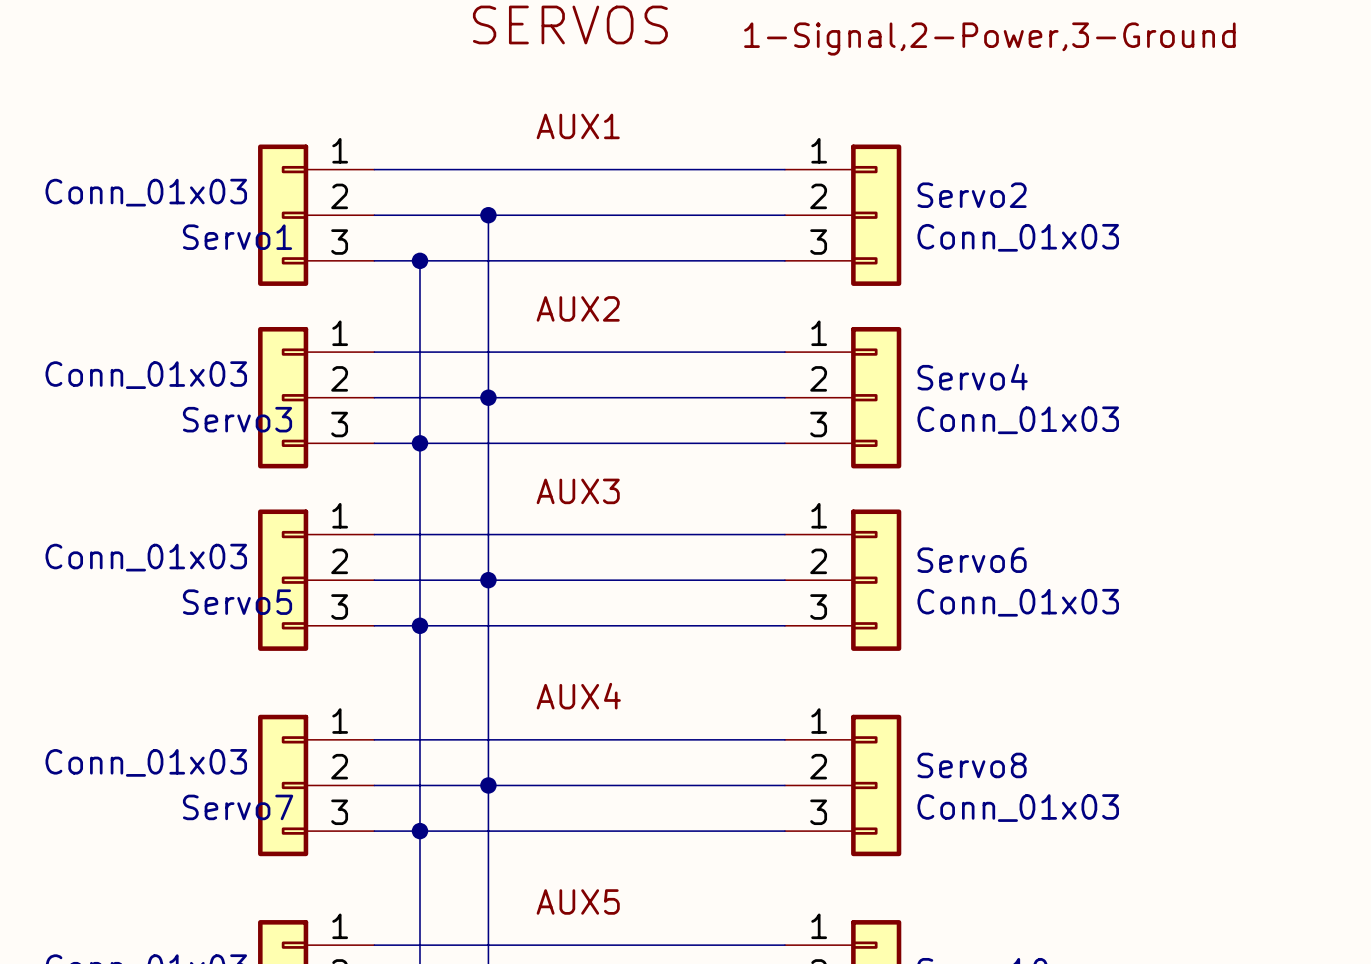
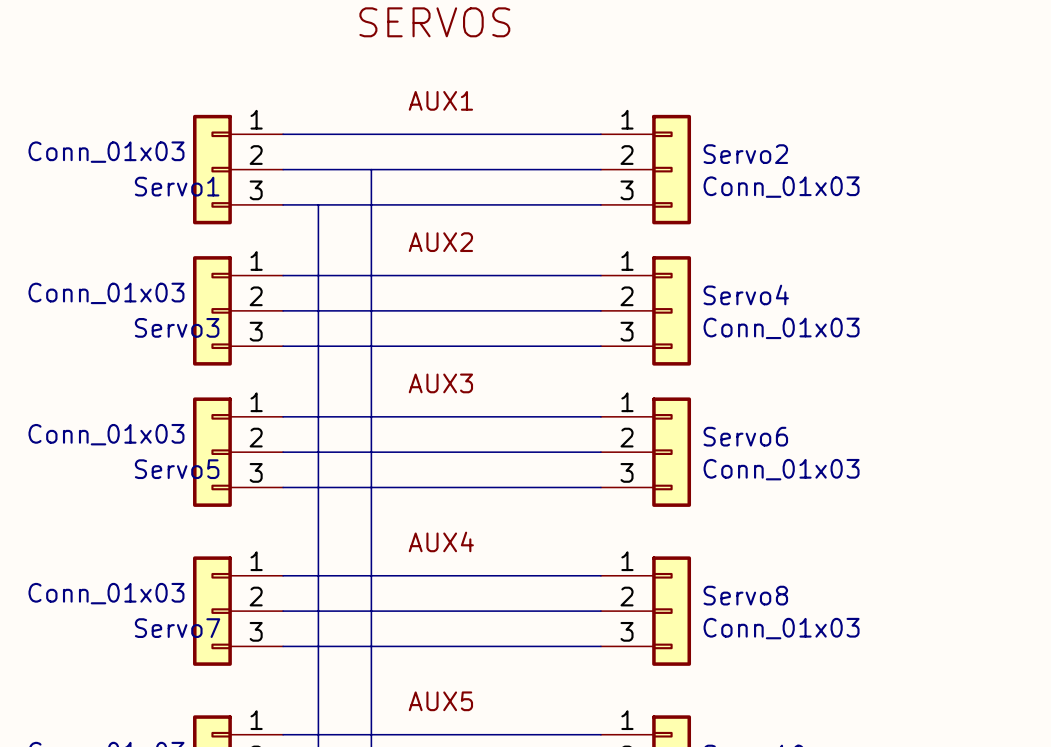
label: 1-Signal,2-Power,3-Ground (989, 39) -> none
junction: (488, 215) -> none
junction: (419, 260) -> none
junction: (488, 397) -> none
junction: (419, 443) -> none
junction: (488, 580) -> none
junction: (419, 625) -> none
junction: (488, 785) -> none
junction: (419, 831) -> none

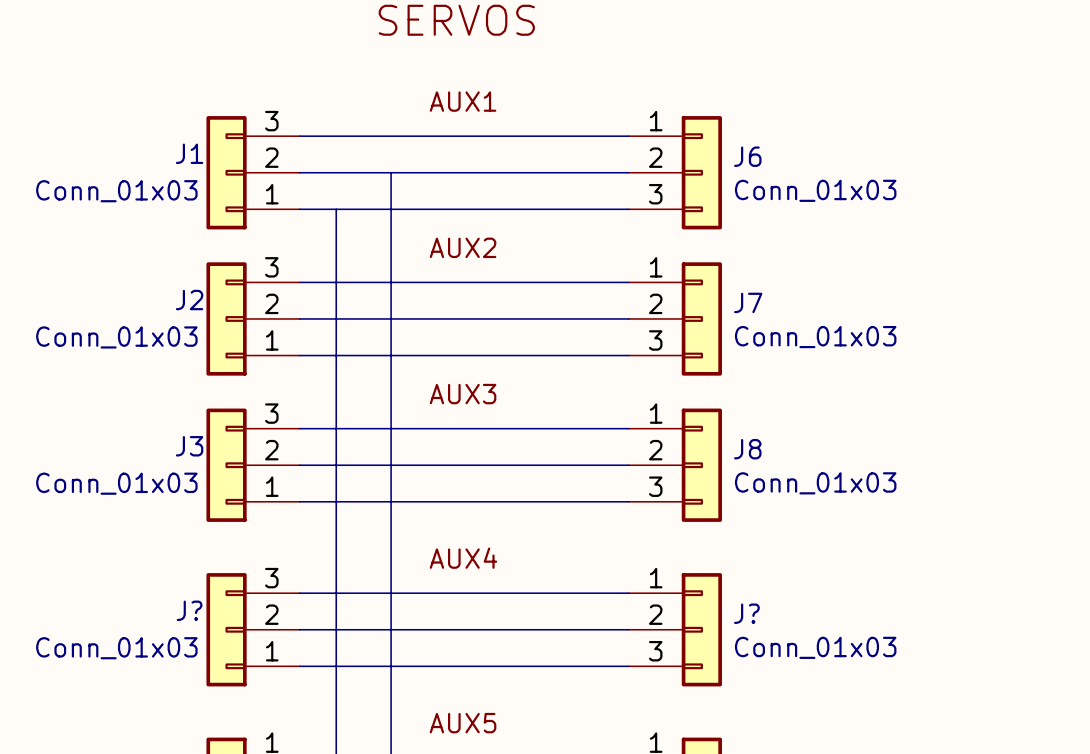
Servo2 name: Servo2 (745, 154) -> J6 (747, 156)
Servo1 flip: as is (212, 169) -> up-down (226, 172)
Servo1 name: Servo1 (177, 186) -> J1 (189, 153)
Servo4 name: Servo4 (746, 294) -> J7 (748, 302)
Servo3 flip: as is (212, 310) -> up-down (226, 318)
Servo3 name: Servo3 (177, 327) -> J2 (189, 300)
Servo6 name: Servo6 (745, 436) -> J8 (747, 449)
Servo5 flip: as is (212, 452) -> up-down (226, 465)
Servo5 name: Servo5 (177, 469) -> J3 (189, 446)
Servo8 name: Servo8 (745, 595) -> J? (746, 613)
Servo7 flip: as is (212, 611) -> up-down (226, 629)
Servo7 name: Servo7 (177, 628) -> J? (189, 610)

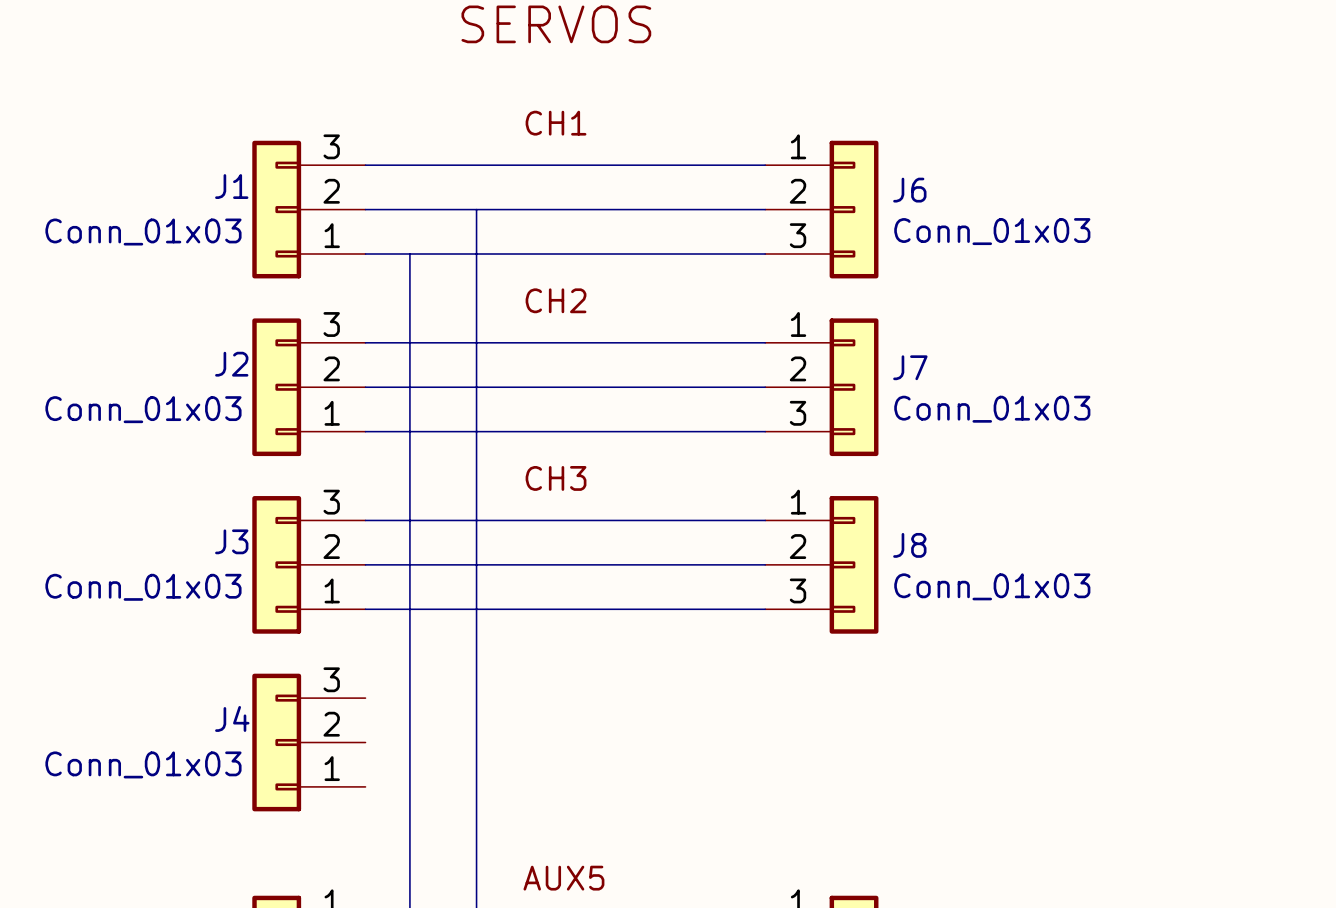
label: AUX1 (463, 101) -> CH1 (556, 123)
label: AUX2 (463, 247) -> CH2 (556, 300)
label: AUX3 (463, 394) -> CH3 (556, 478)
label: AUX4 (463, 558) -> none
wire: (299, 593) (628, 593) -> none
J4: none -> Conn_01x03 (308, 742)
J?: Conn_01x03 (253, 629) -> none
wire: (299, 629) (628, 629) -> none
J?: Conn_01x03 (675, 629) -> none
wire: (299, 666) (628, 666) -> none

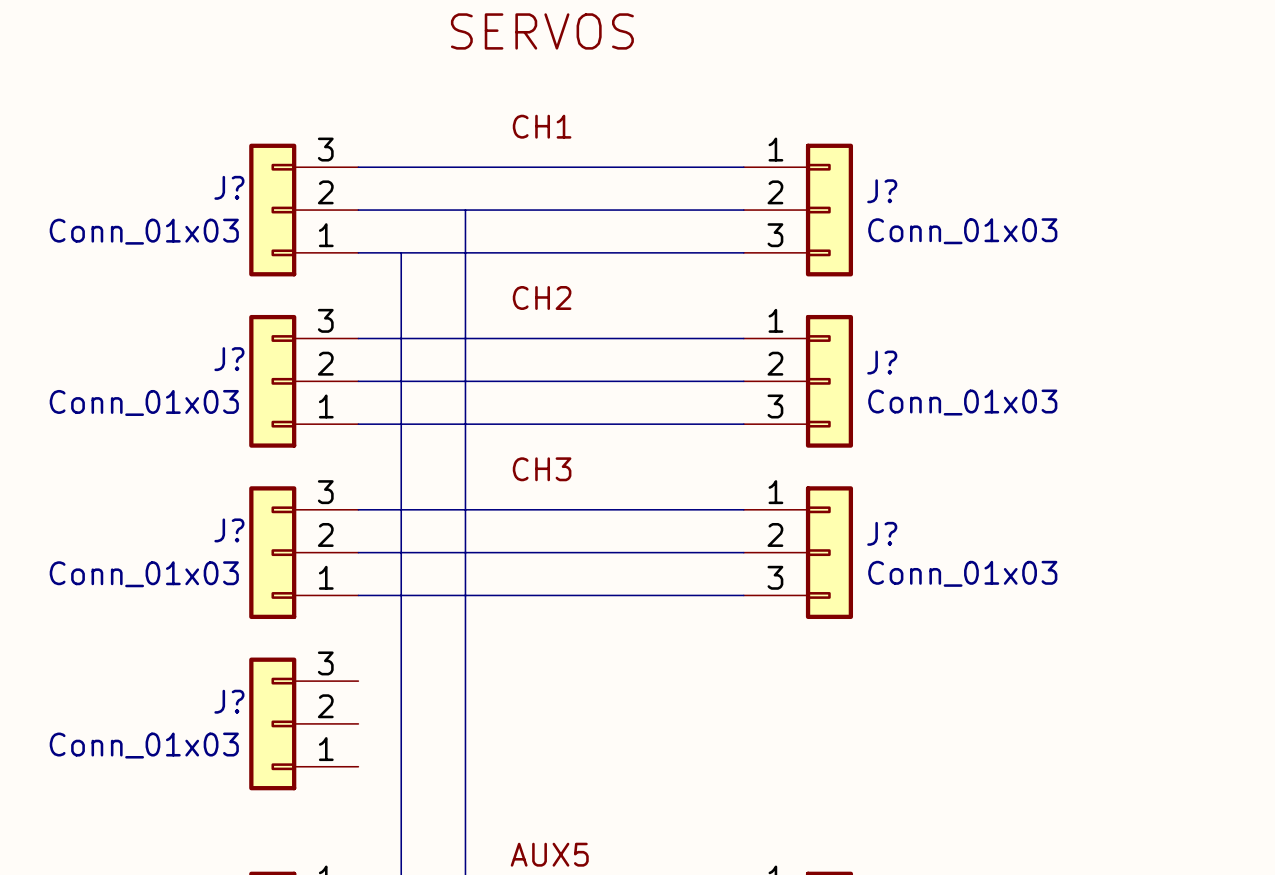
J1 name: J1 (231, 186) -> J? (229, 187)
J6 name: J6 (909, 190) -> J? (882, 191)
J2 name: J2 (231, 364) -> J? (229, 359)
J7 name: J7 (910, 367) -> J? (882, 362)
J3 name: J3 (231, 541) -> J? (229, 530)
J8 name: J8 (909, 545) -> J? (882, 533)
J4 name: J4 (232, 718) -> J? (229, 701)

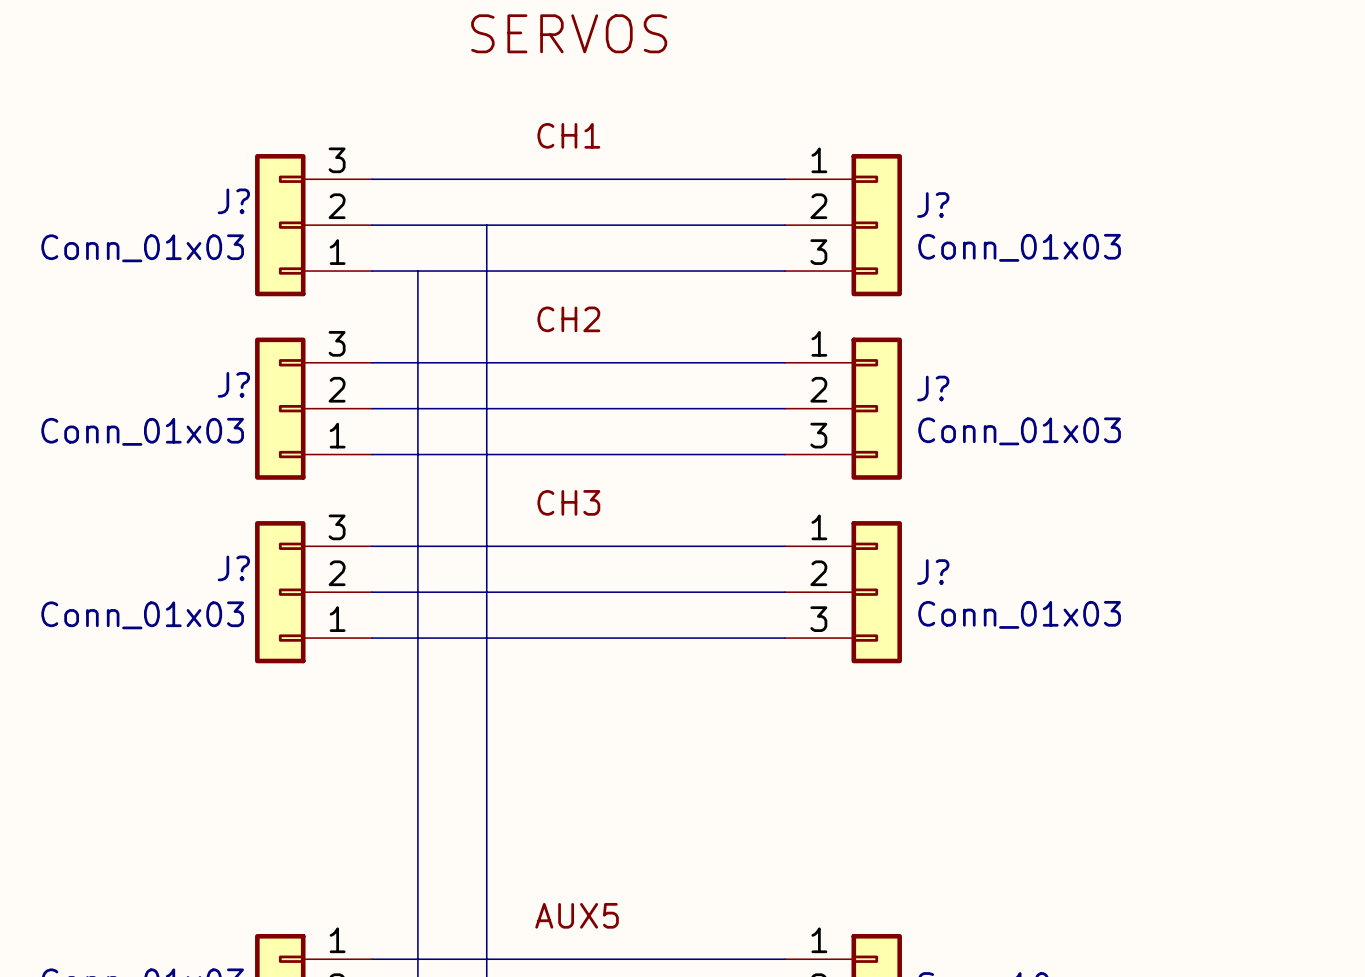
J?: Conn_01x03 (303, 723) -> none

